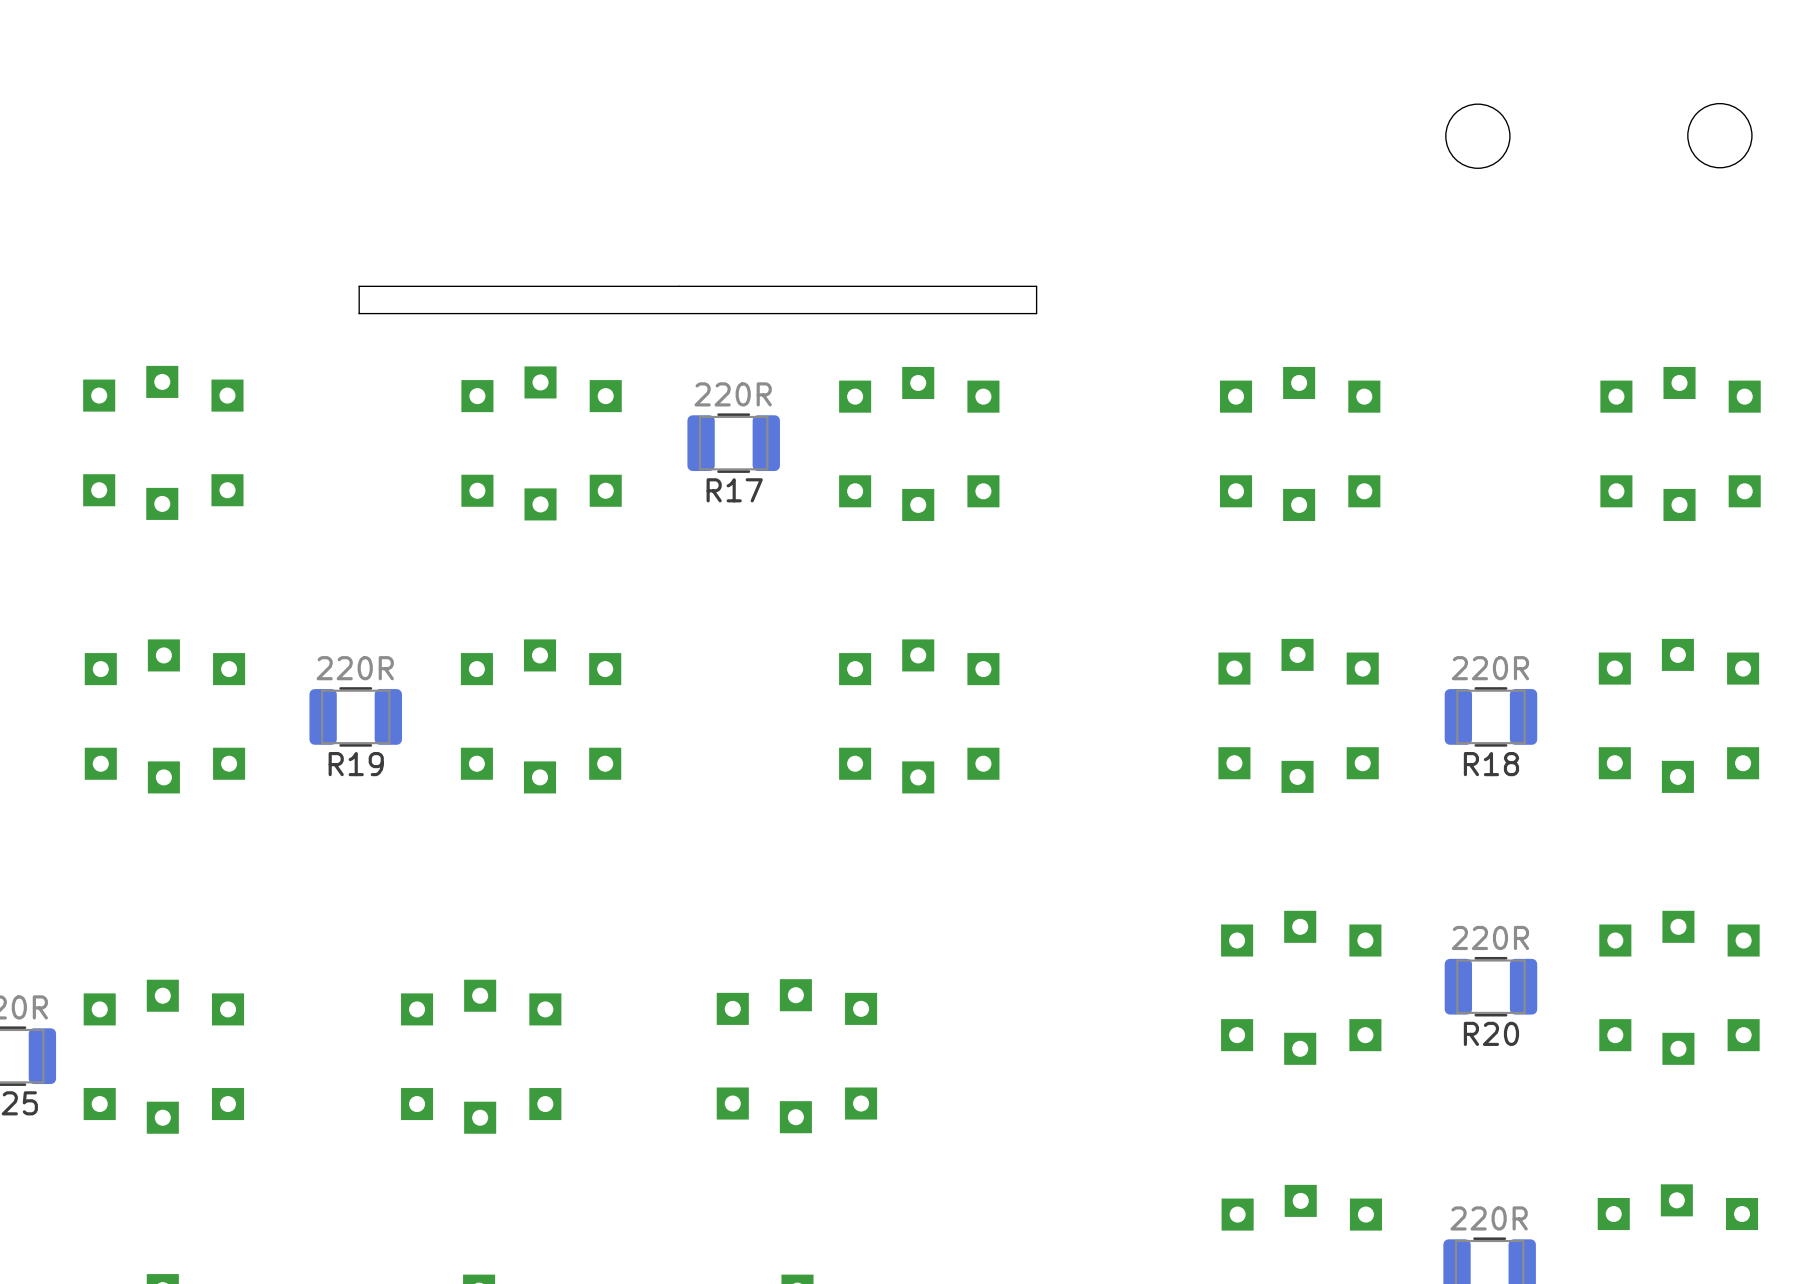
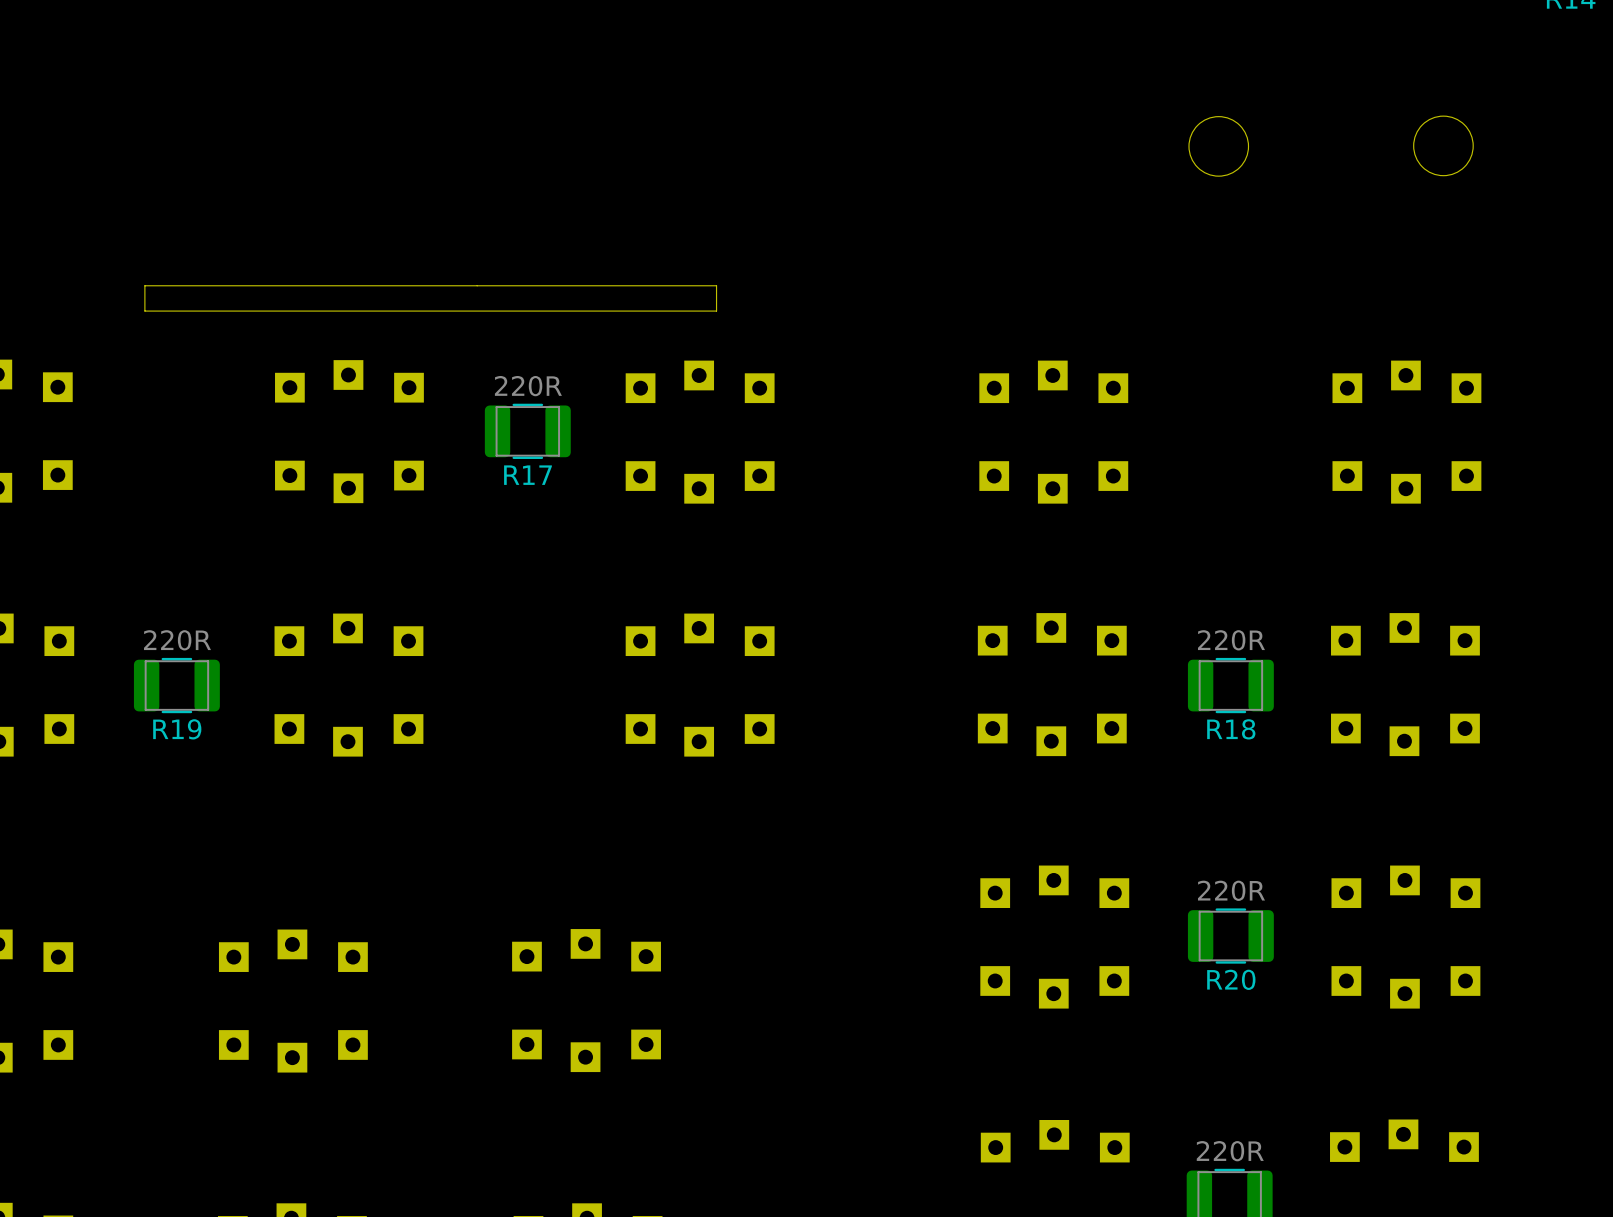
board edge: (359, 286) (359, 313) -> (180, 285) (144, 285) (144, 311) (180, 311)
board edge: (936, 286) (1036, 286) (1036, 313) (936, 313) -> (716, 285) (716, 311)

